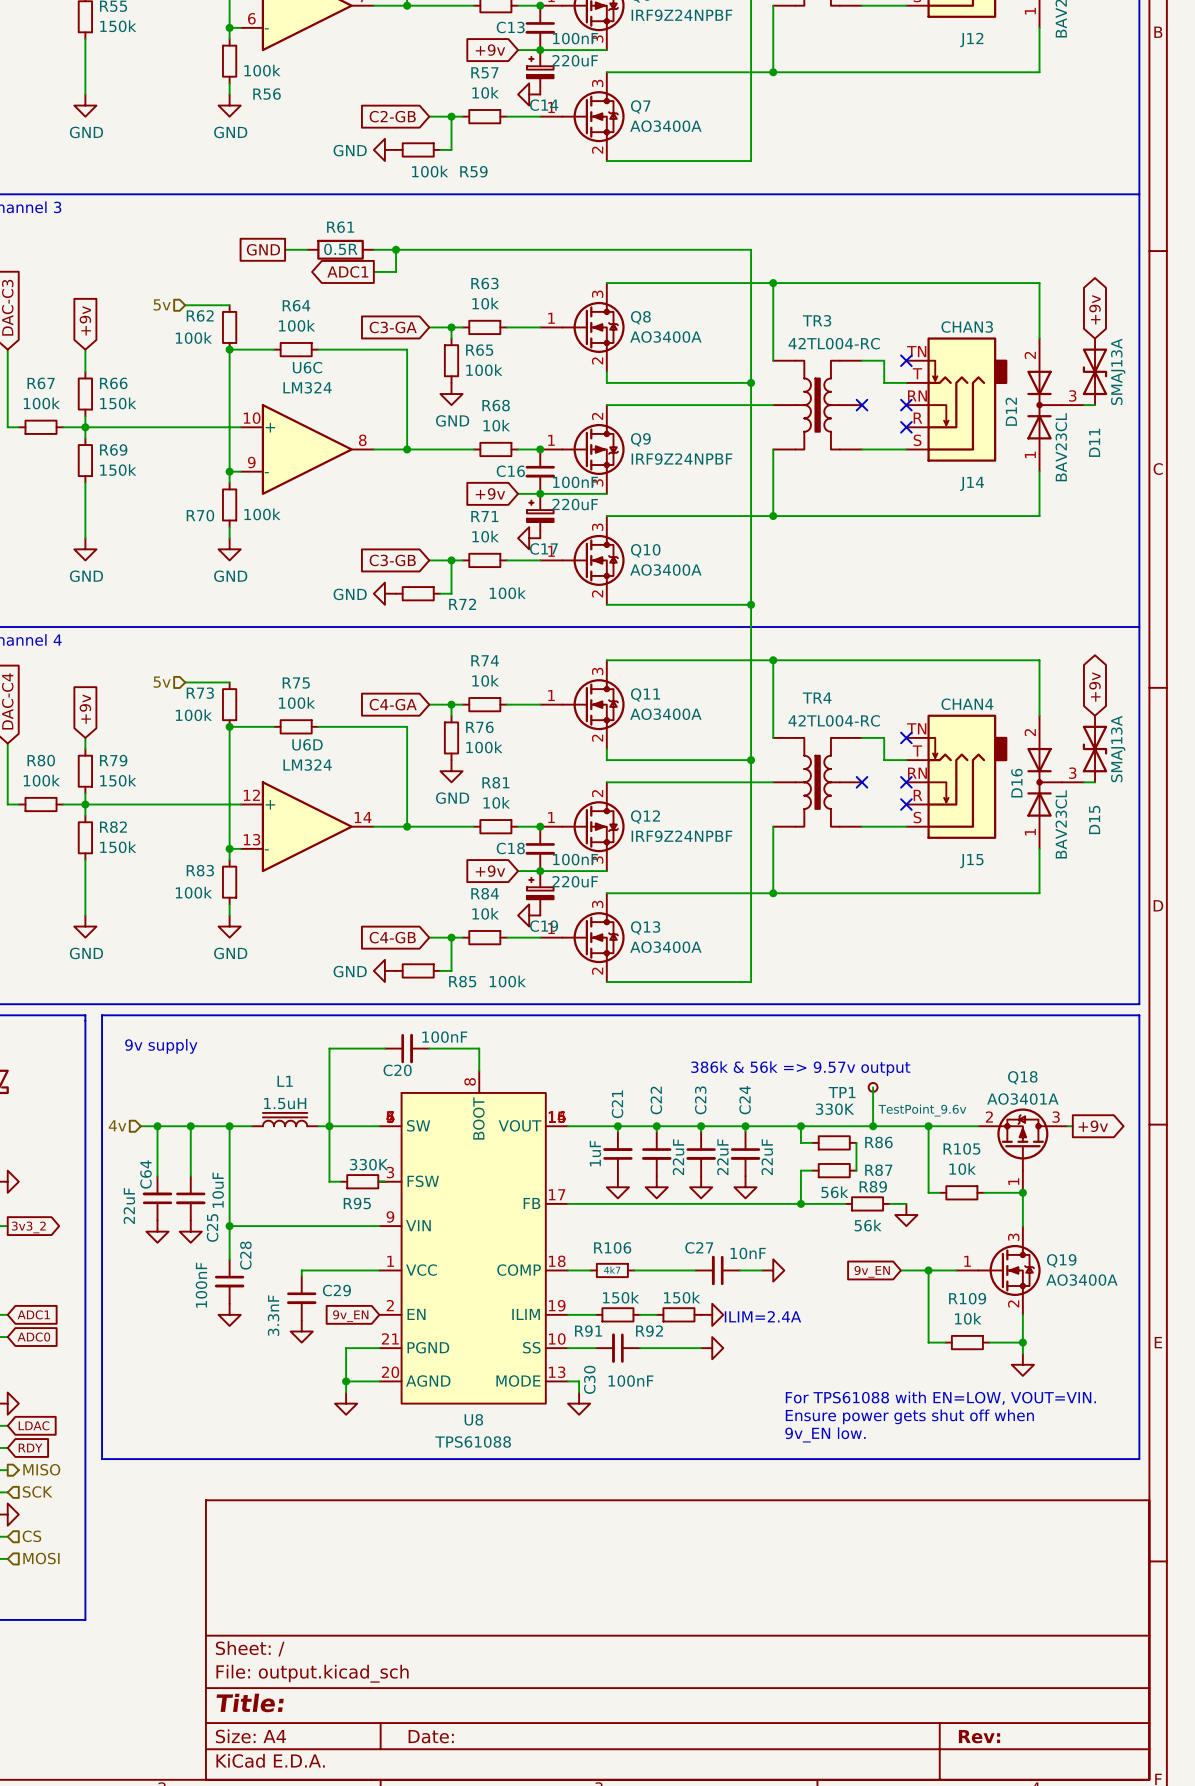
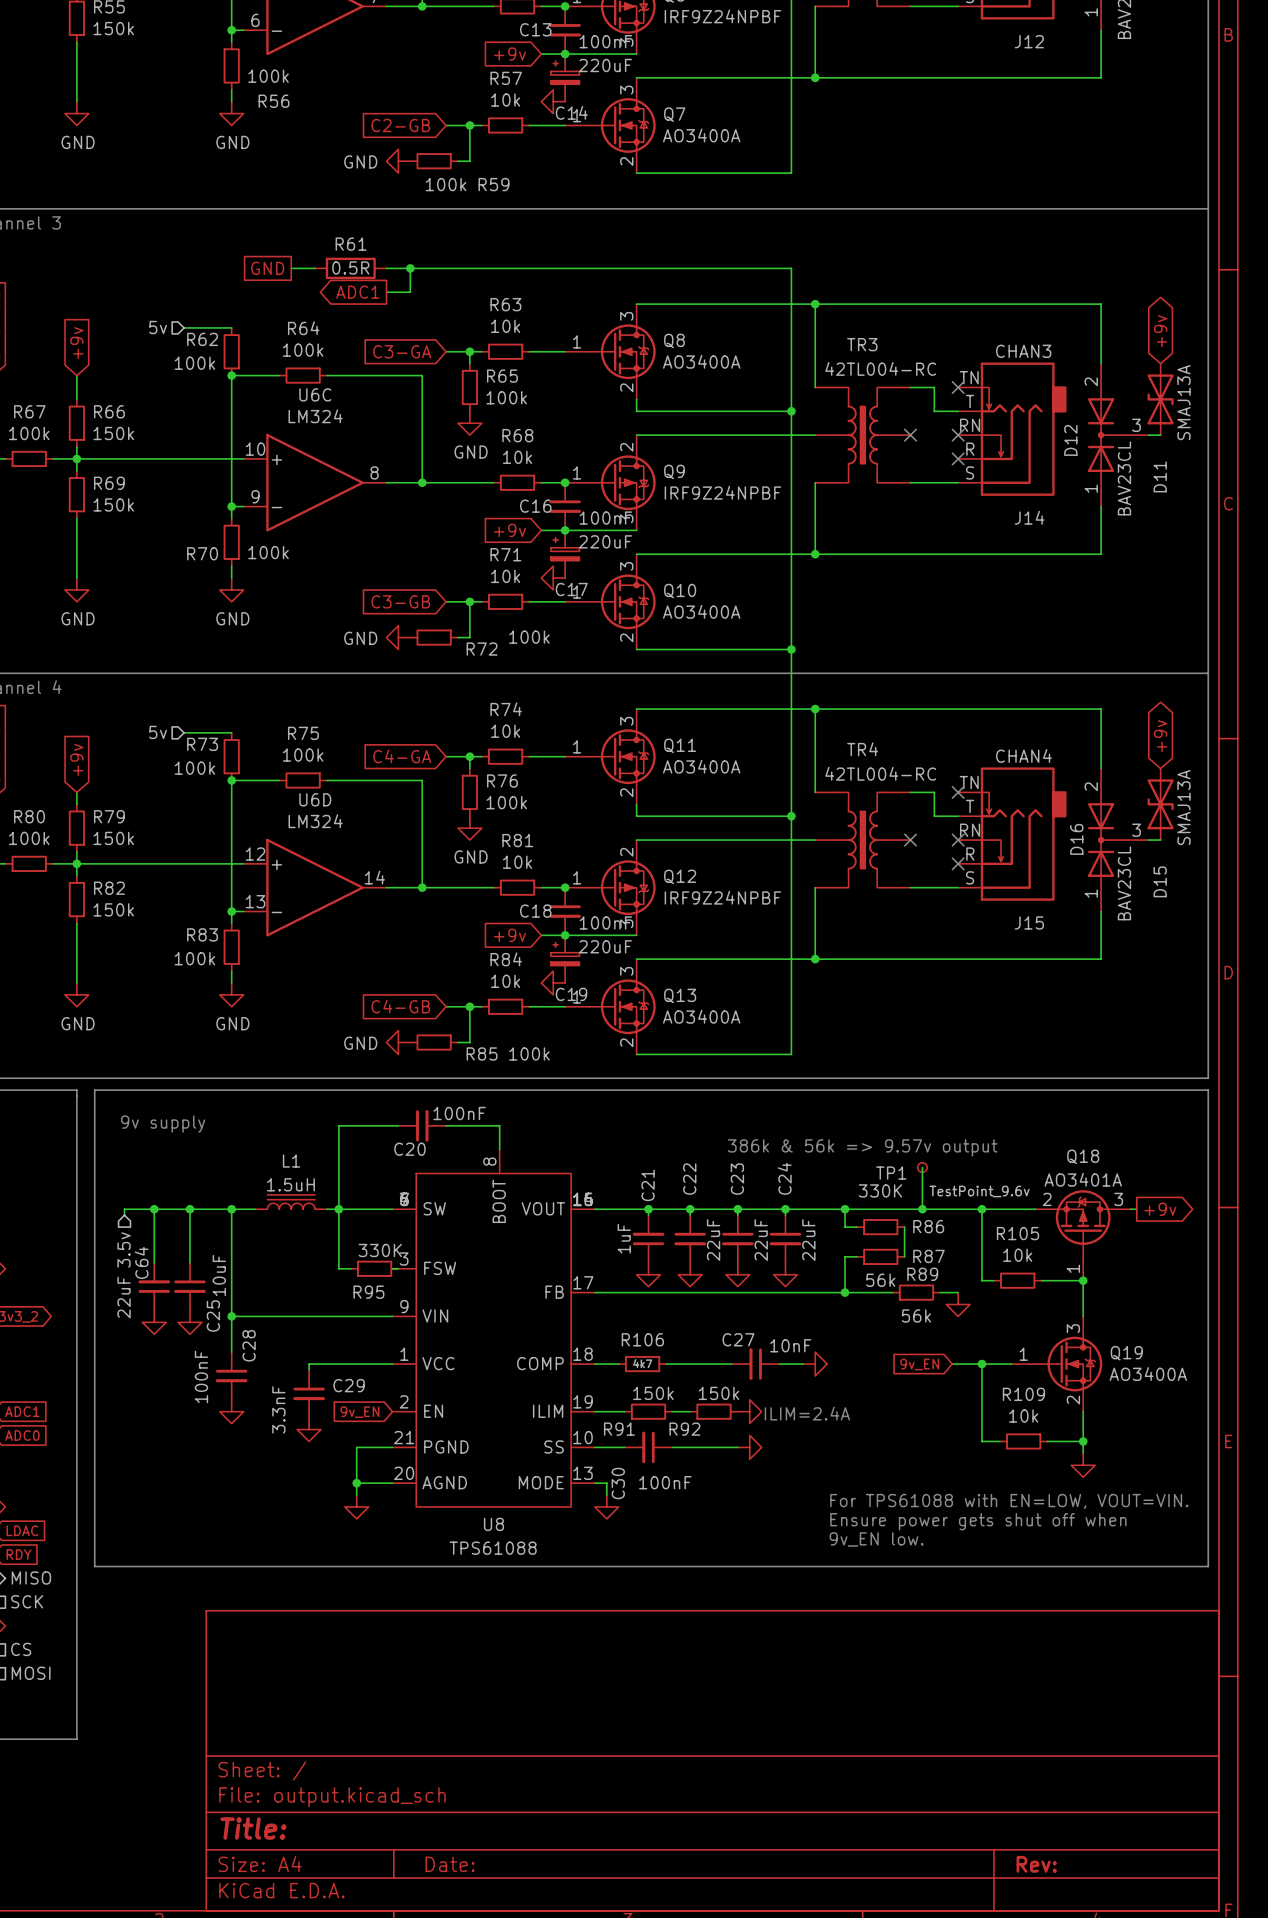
hierarchical label: 4v (117, 1125) -> none
wire: none -> (136, 1209) (124, 1209) (124, 1215)
hierarchical label: none -> 3.5v (124, 1249)

